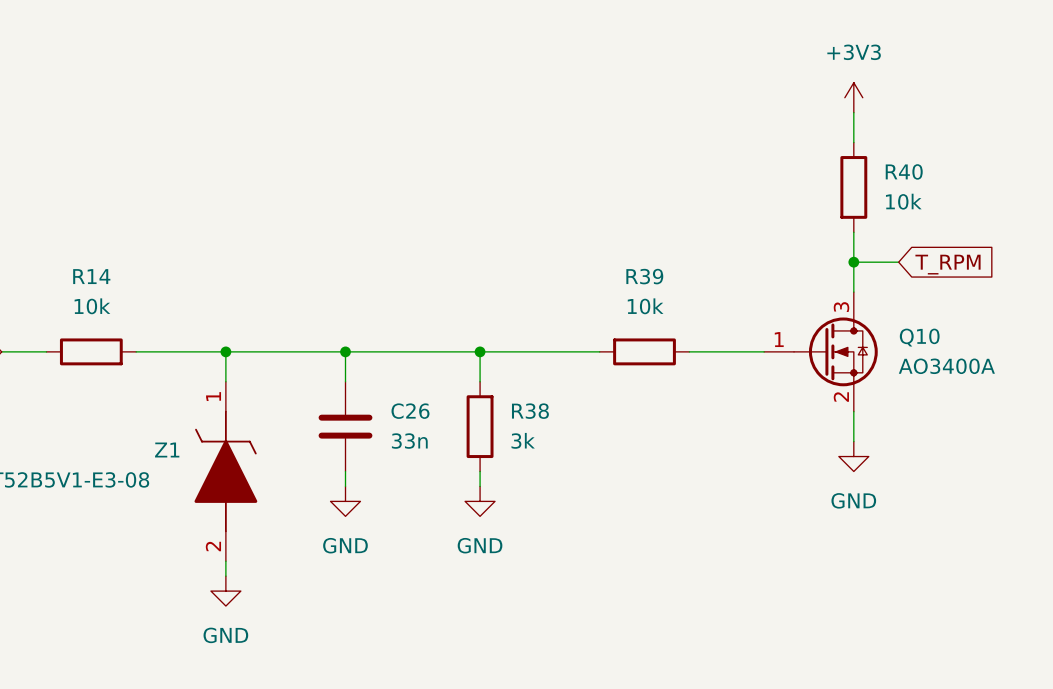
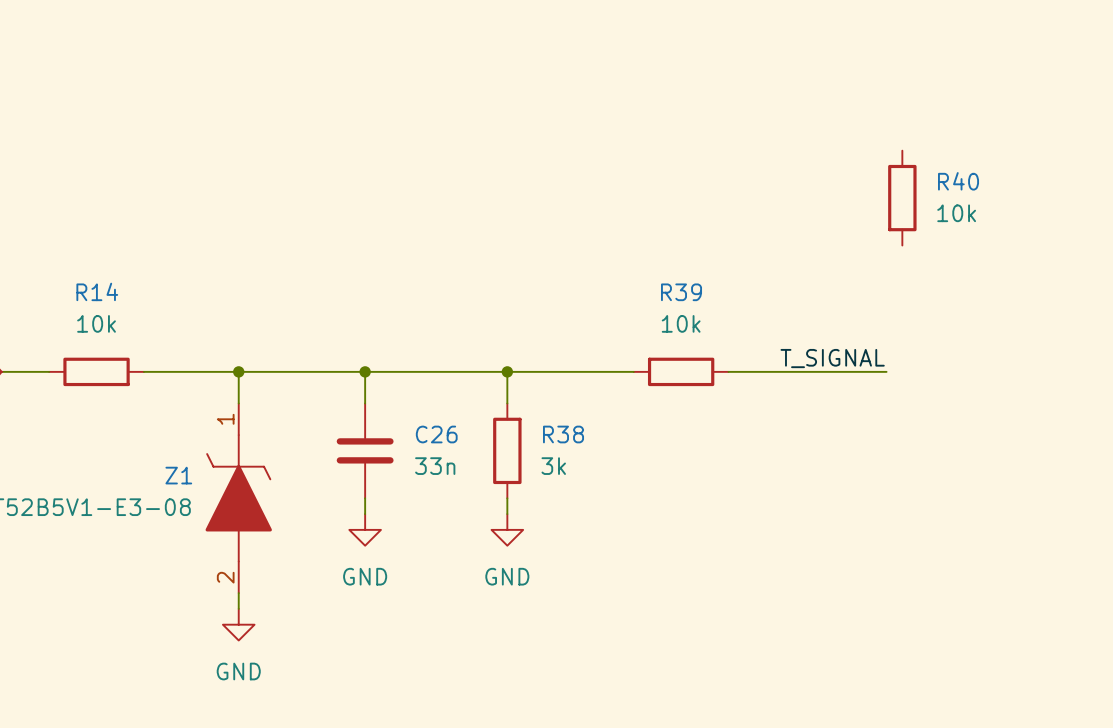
power symbol: +3V3 (853, 97) -> none
wire: (853, 112) (853, 142) -> none
wire: (853, 232) (853, 292) -> none
wire: (853, 262) (898, 262) -> none
junction: (853, 262) -> none
global label: T_RPM (948, 264) -> none
label: none -> T_SIGNAL (832, 358)
Q10: AO3400A (820, 351) -> none
wire: (853, 411) (853, 441) -> none
power symbol: GND (853, 456) -> none

